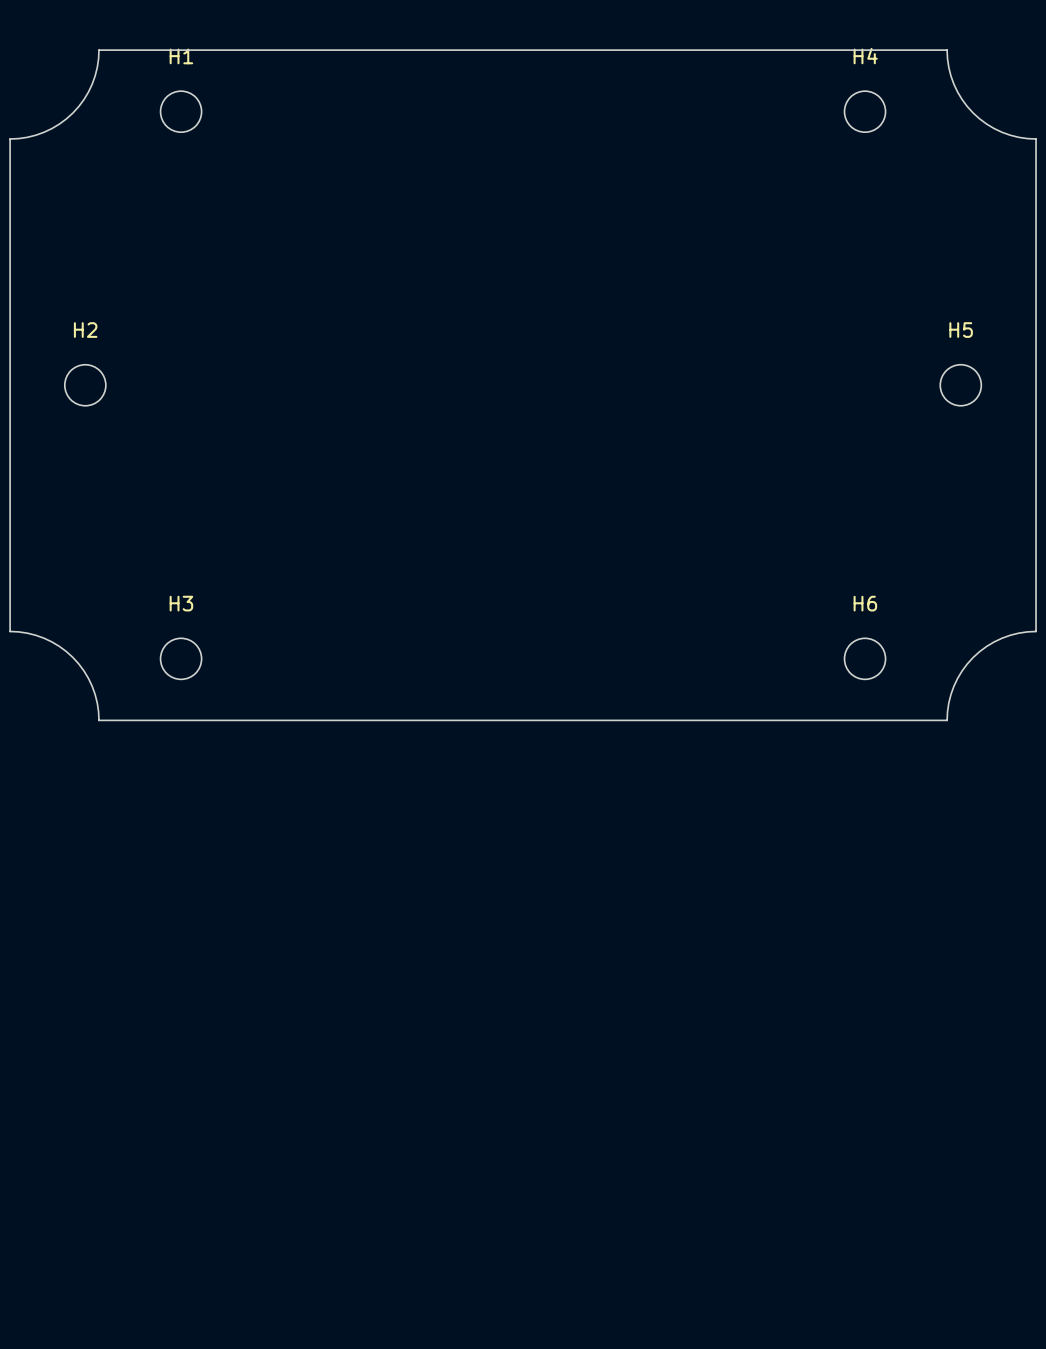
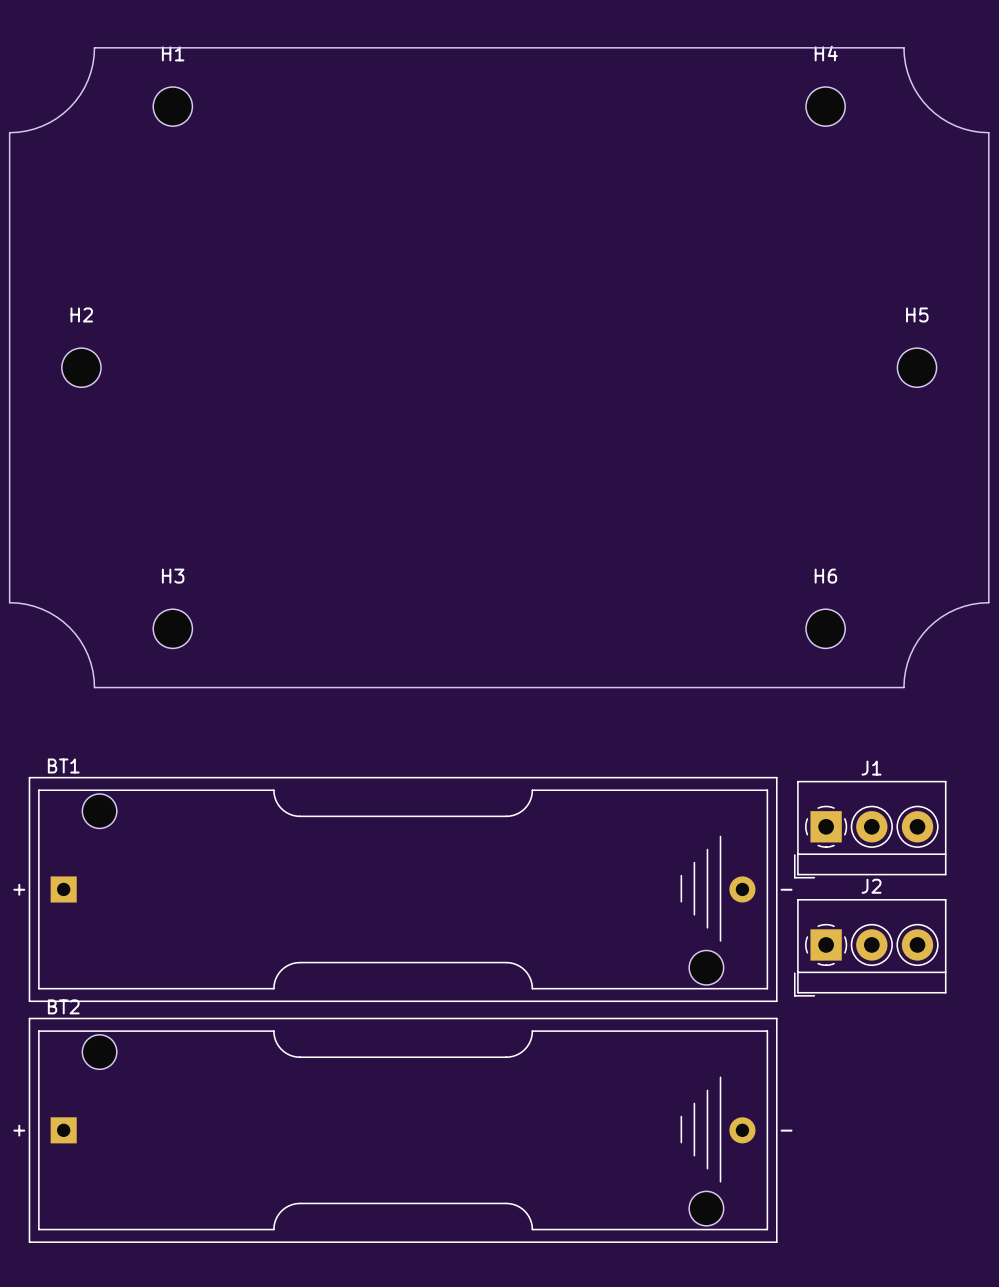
J1: none -> (870, 829)
BT1: none -> (403, 889)
J2: none -> (870, 947)
BT2: none -> (403, 1130)

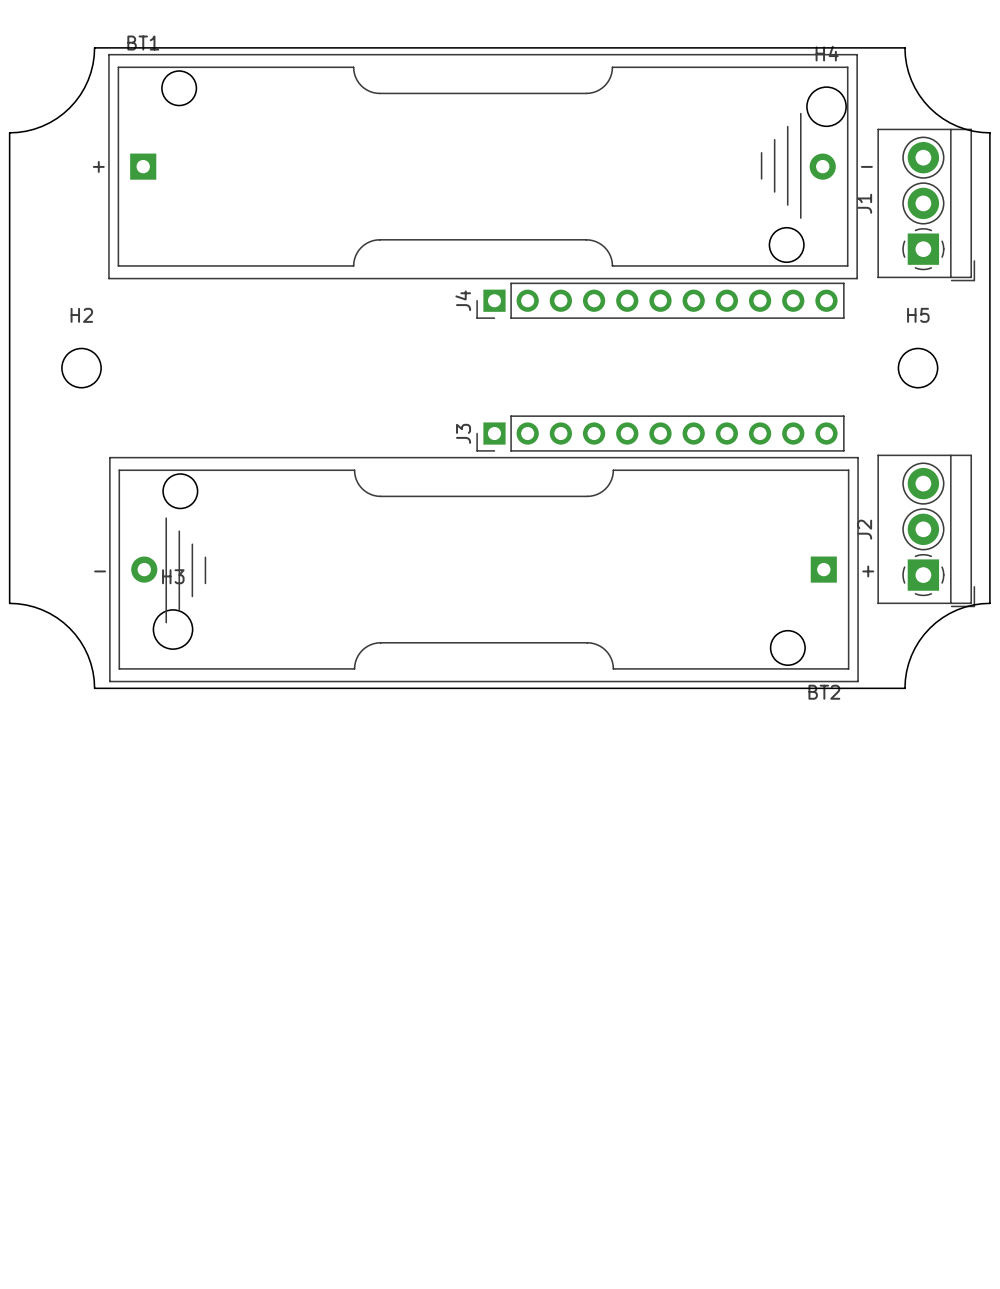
H1: (172, 106) -> none
J4: none -> (660, 300)
J3: none -> (660, 433)
H6: (825, 628) -> none
J1 rotation: 0° (870, 829) -> 90° counterclockwise (926, 204)
J1 position: (870, 829) -> (926, 204)
BT1 position: (403, 889) -> (483, 166)
J2 rotation: 0° (870, 947) -> 90° counterclockwise (926, 530)
J2 position: (870, 947) -> (926, 530)
BT2 rotation: 0° (403, 1130) -> 180° (483, 569)
BT2 position: (403, 1130) -> (483, 569)

